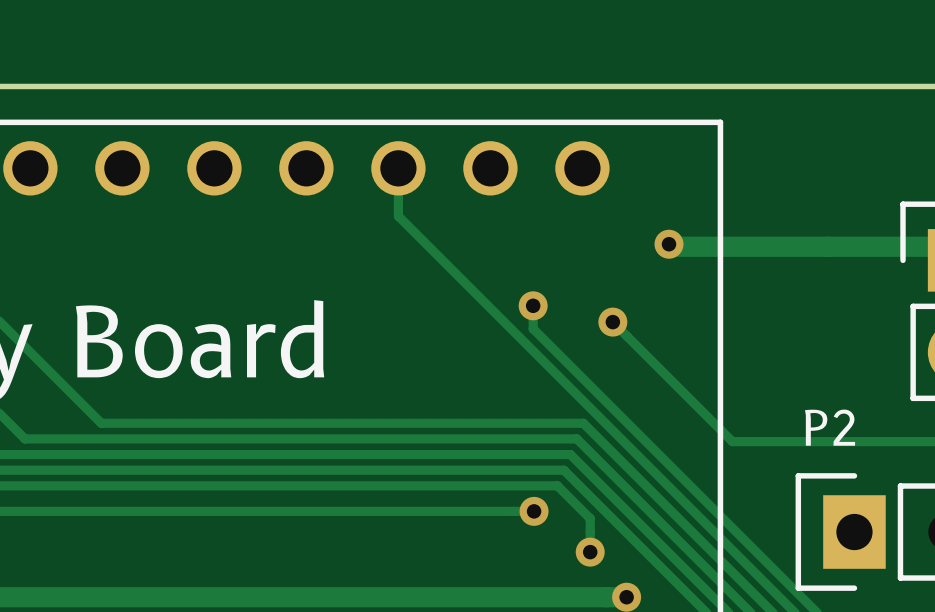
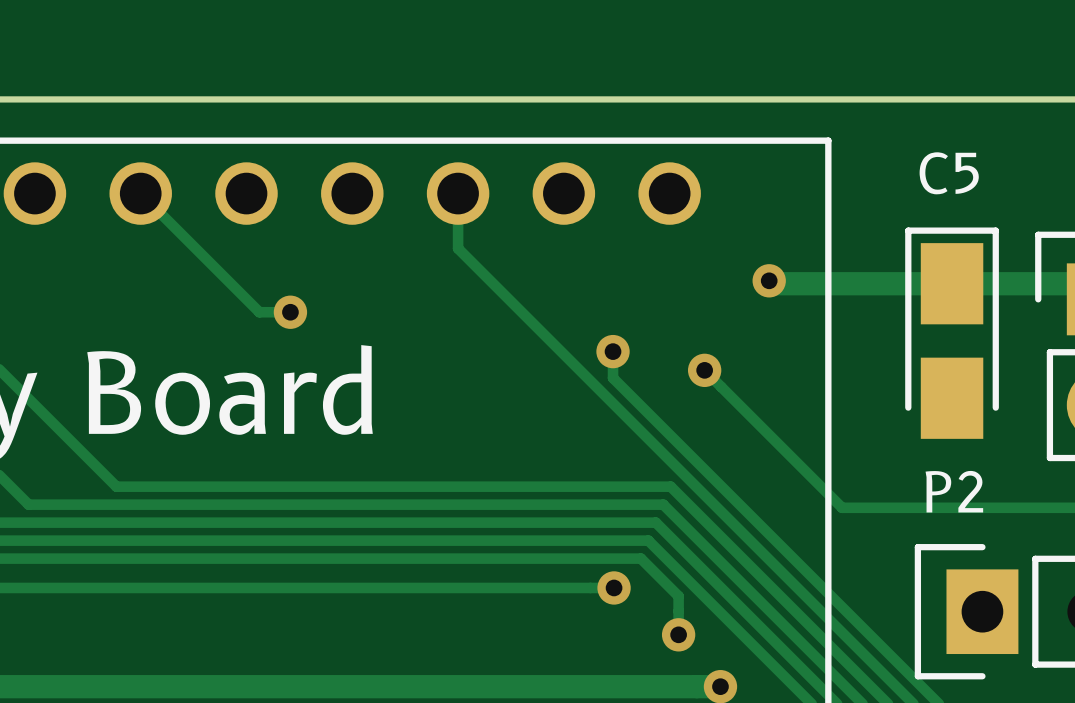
track: none -> (140, 193) (259, 312) (290, 312)
via: none -> (290, 312)
C5: none -> (952, 333)

